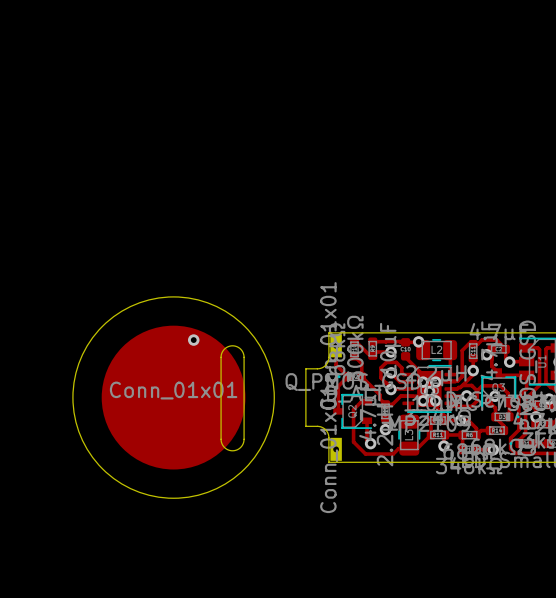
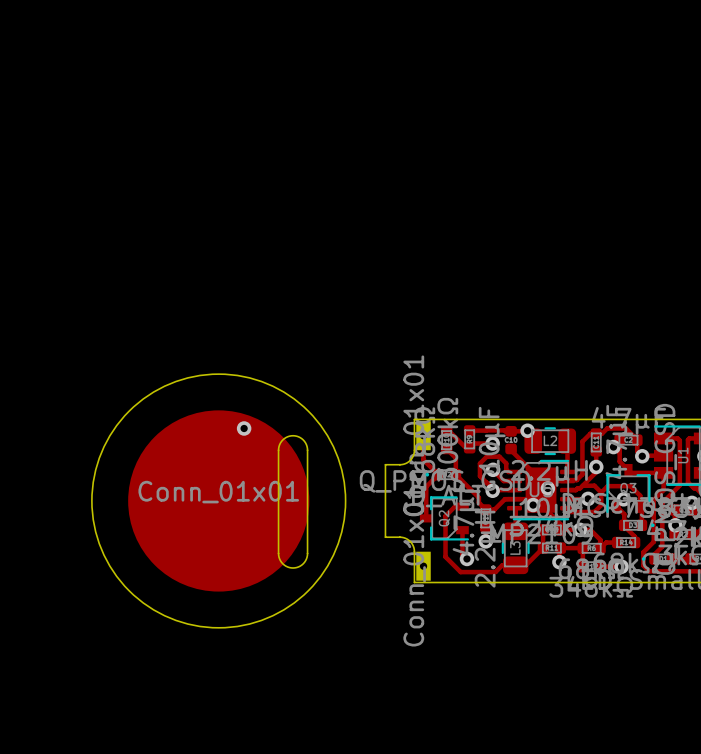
via: (423, 382) -> none
via: (435, 382) -> none
via: none -> (547, 488)
via: (429, 391) -> none
via: (435, 400) -> none

